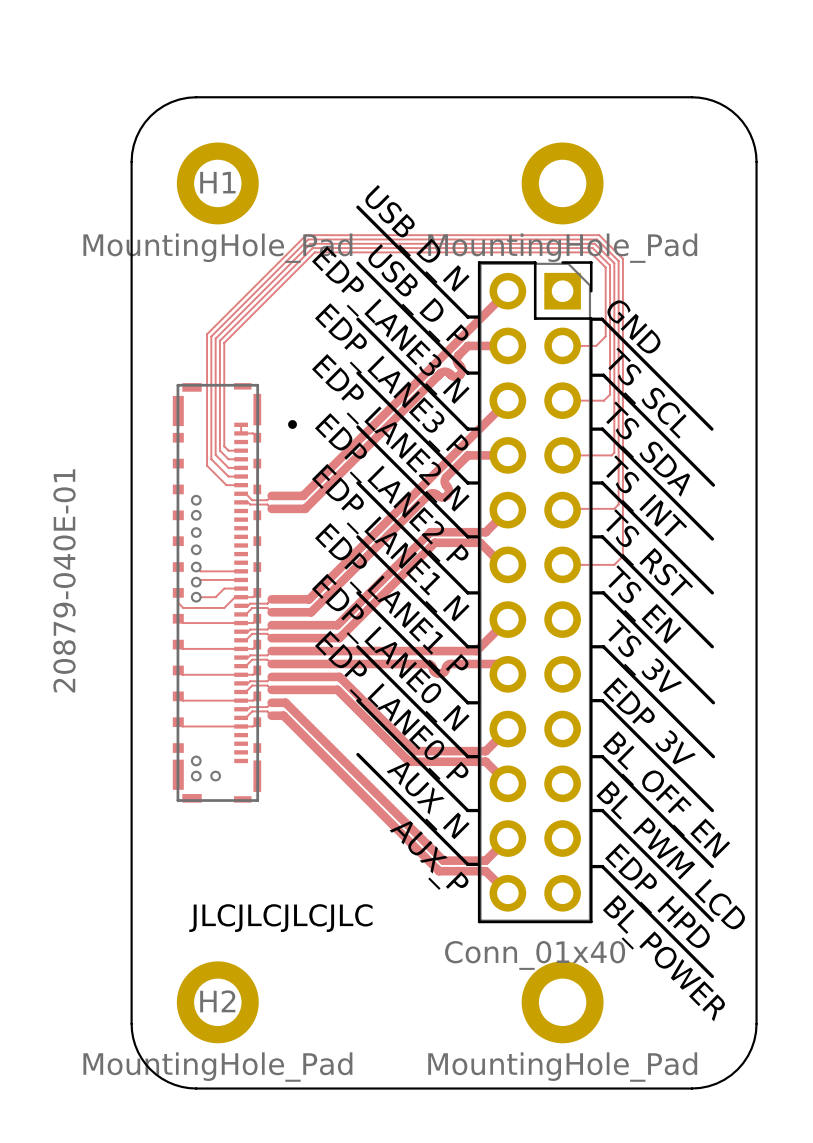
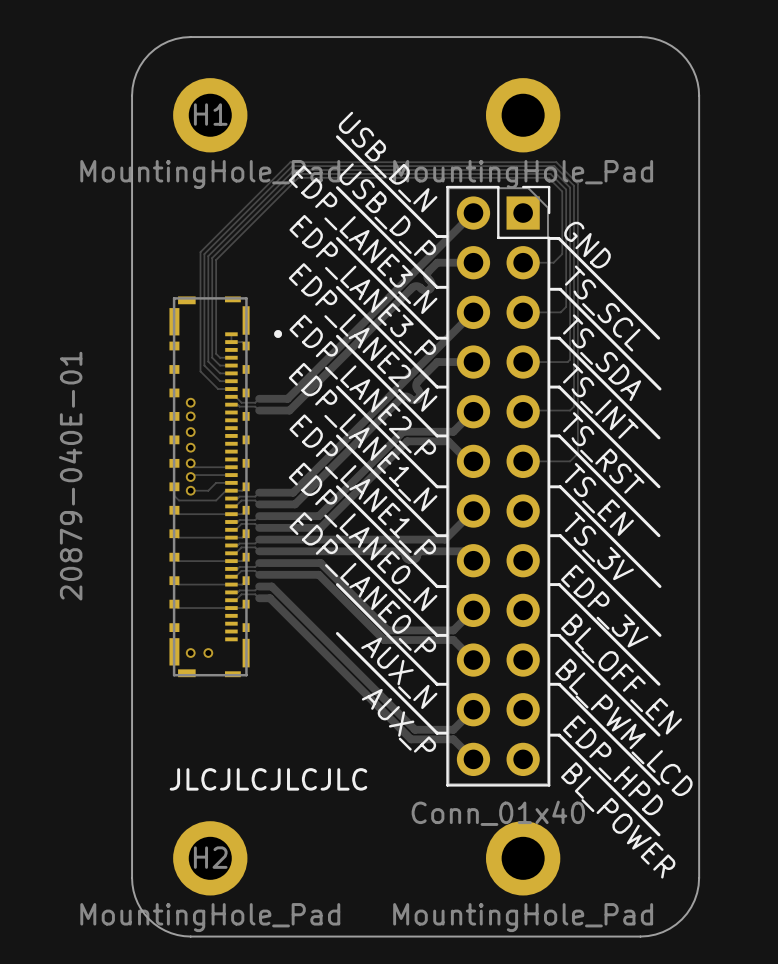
via: (196, 760) -> none

